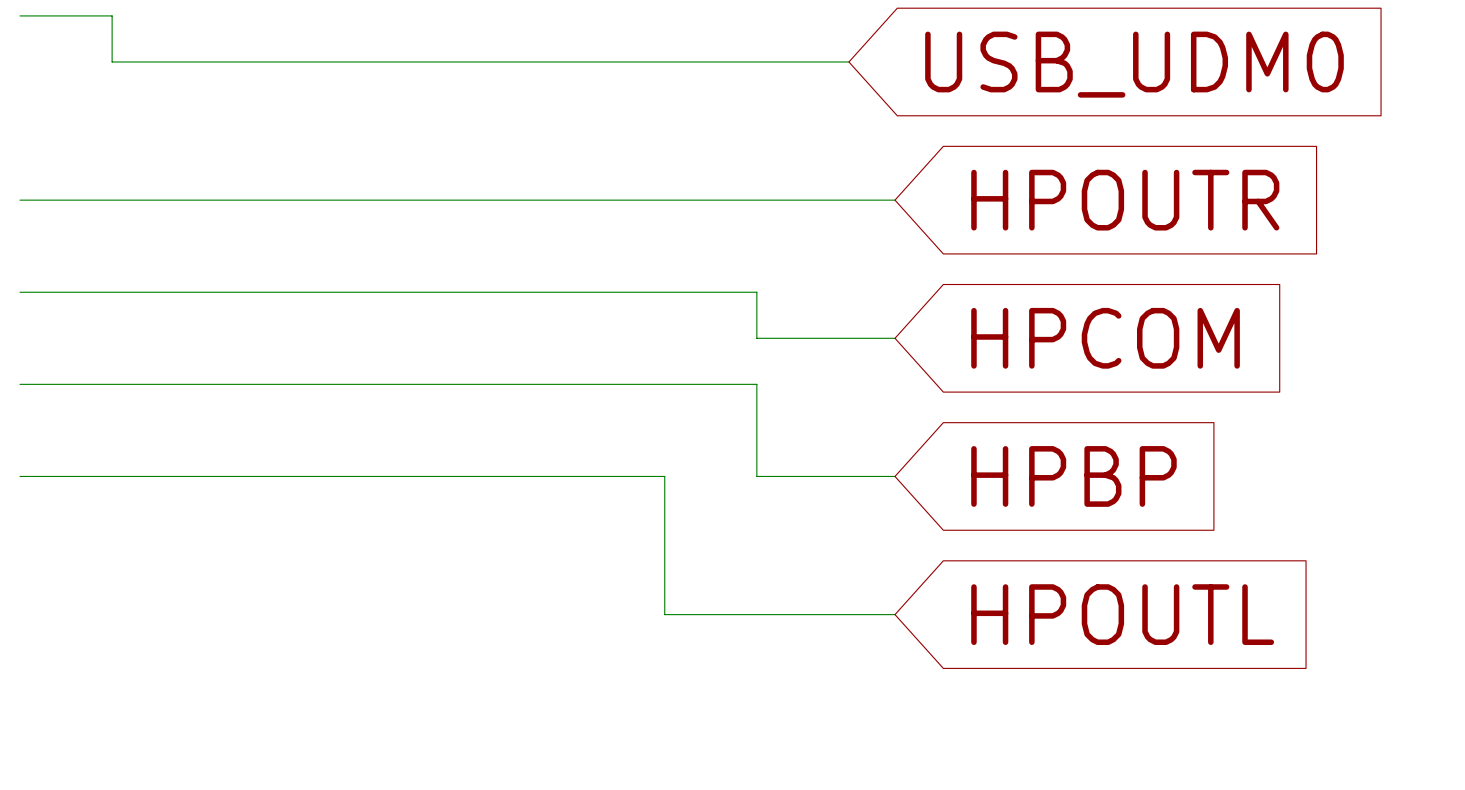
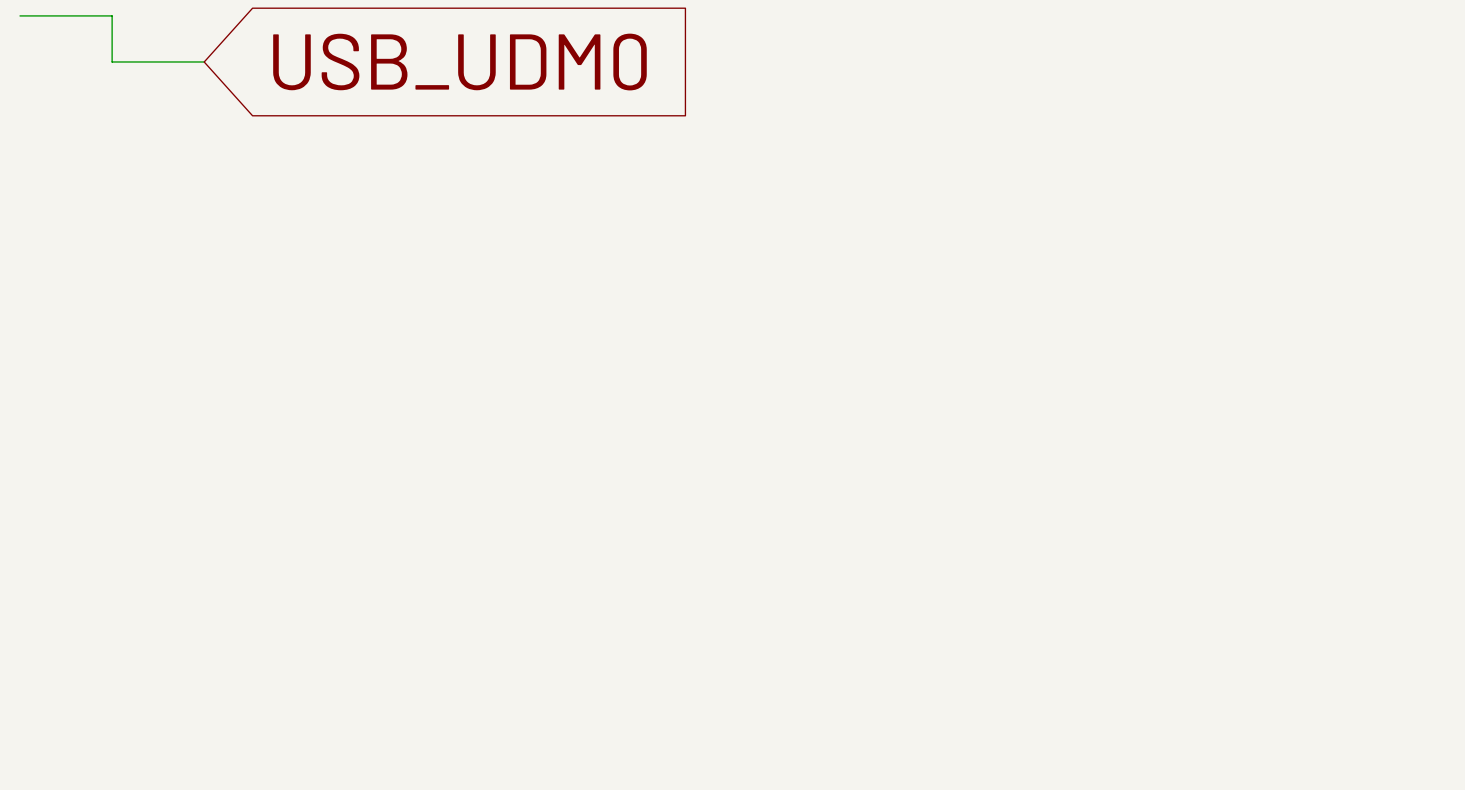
wire: (204, 61) (848, 61) -> none
global label position: USB_UDM0 (1134, 64) -> USB_UDM0 (459, 62)
wire: (20, 200) (895, 200) -> none
global label: HPOUTR (1125, 200) -> none
wire: (20, 292) (756, 292) (756, 338) (895, 338) -> none
global label: HPCOM (1105, 338) -> none
wire: (20, 384) (756, 384) (756, 476) (895, 476) -> none
wire: (20, 476) (664, 476) (664, 614) (895, 614) -> none
global label: HPBP (1073, 476) -> none
global label: HPOUTL (1122, 614) -> none

